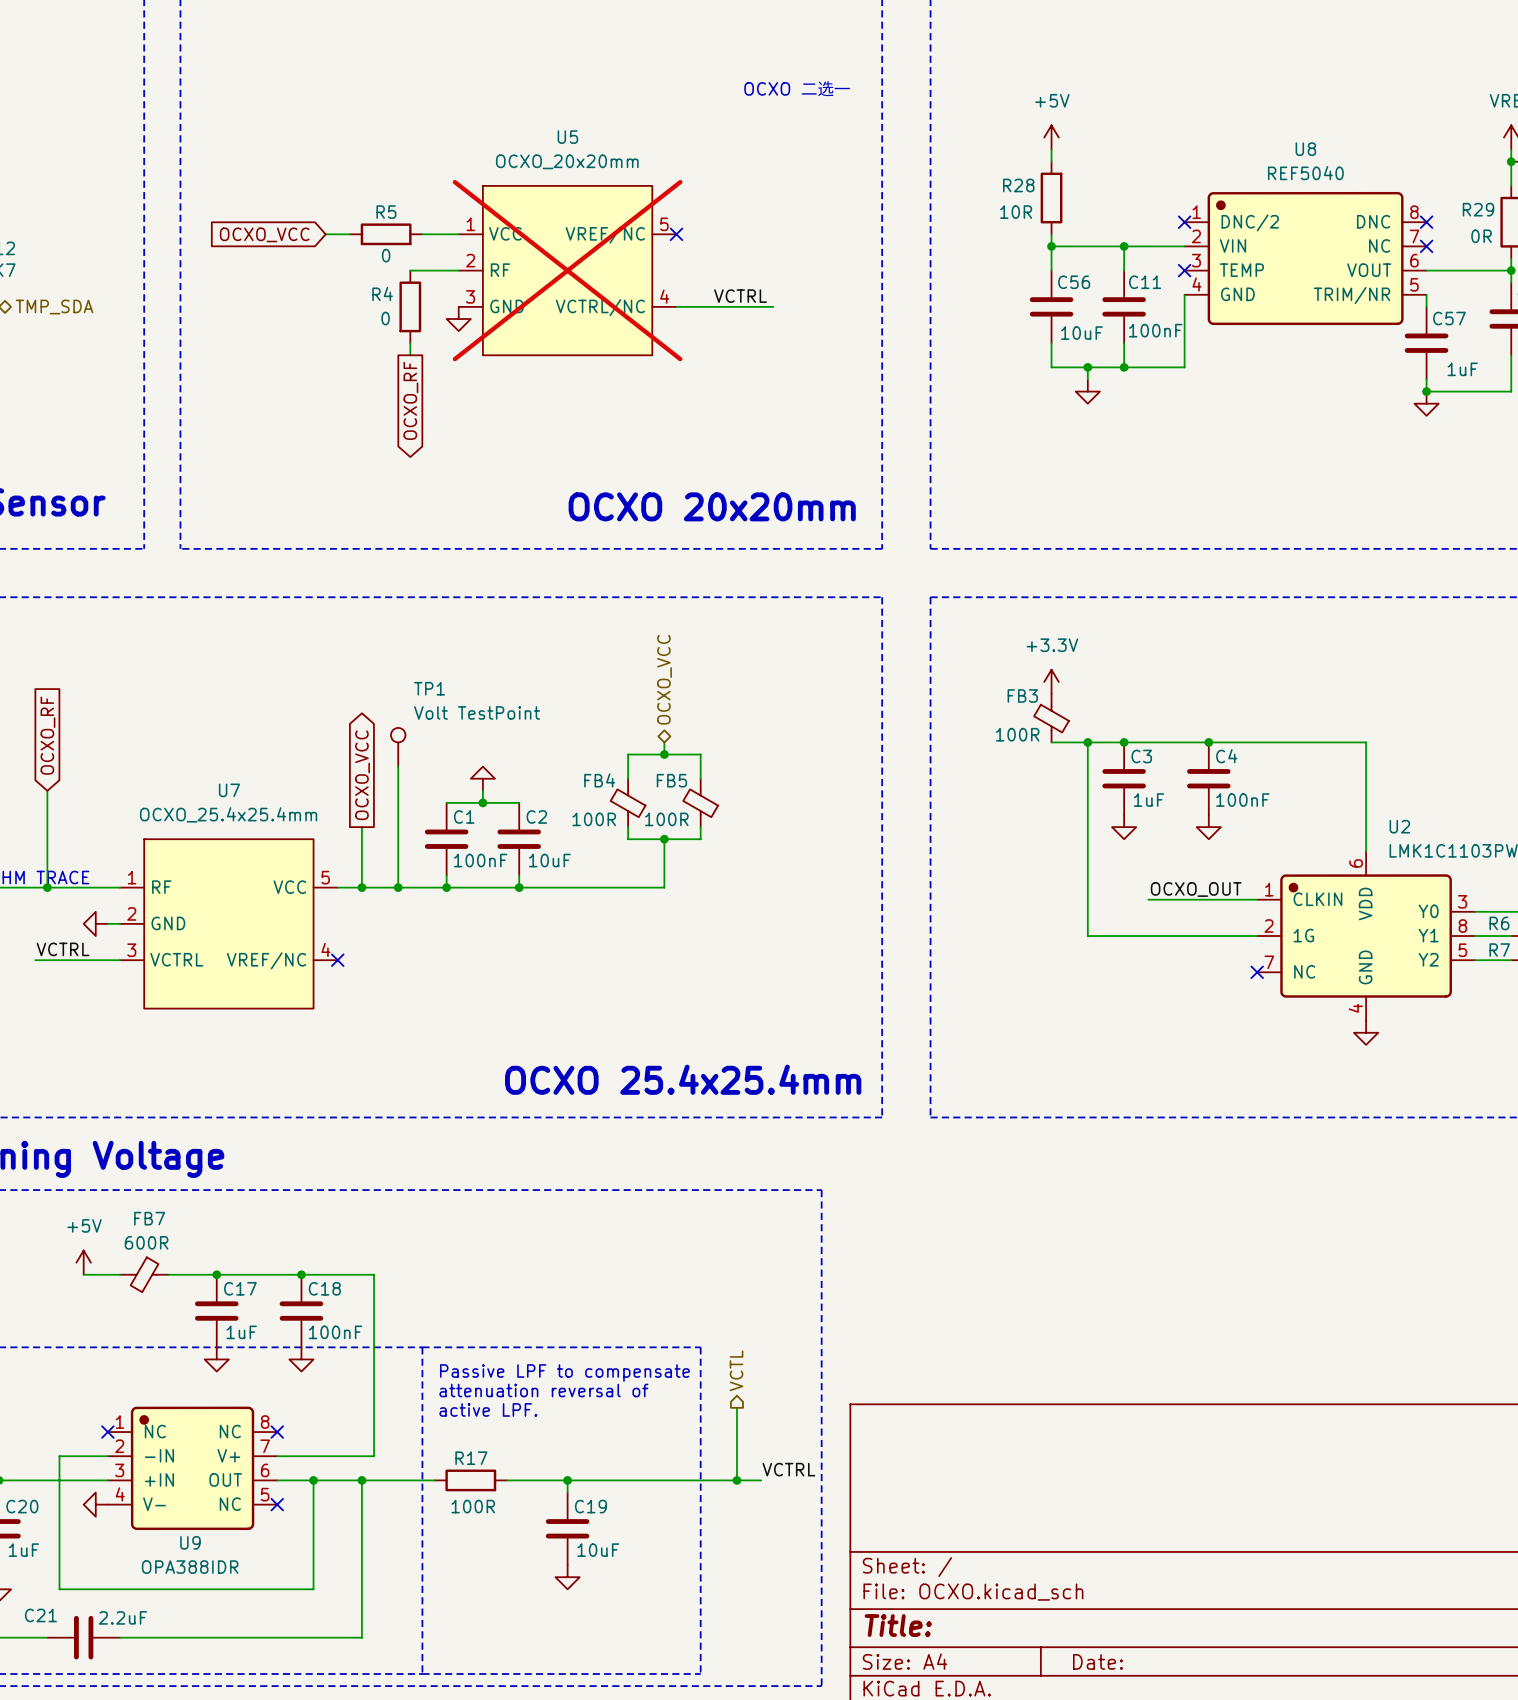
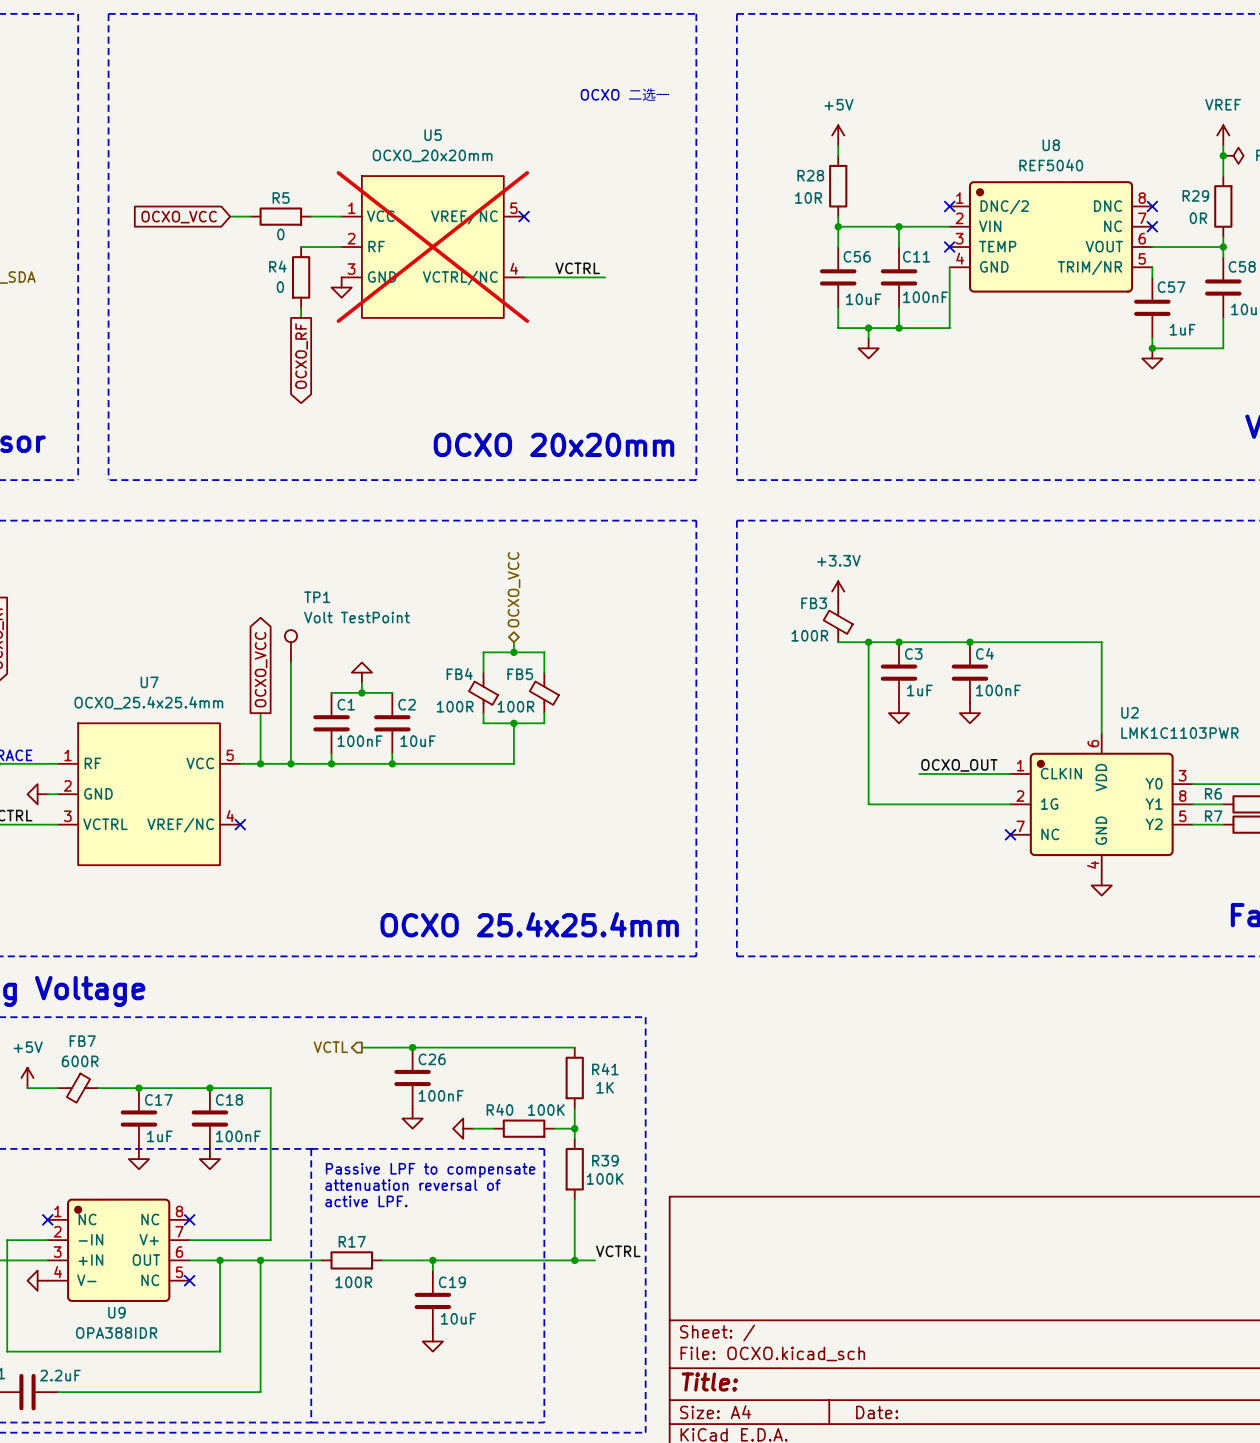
hierarchical label: none -> VCTL (330, 1047)
wire: none -> (361, 1047) (574, 1047)
junction: none -> (412, 1047)
C26: none -> 100nF (412, 1078)
R41: none -> 1K (574, 1078)
wire: none -> (574, 1108) (574, 1138)
power symbol: none -> (412, 1118)
power symbol: none -> (463, 1128)
wire: none -> (473, 1128) (493, 1128)
R40: none -> 100K (524, 1128)
wire: none -> (554, 1128) (574, 1128)
junction: none -> (574, 1128)
hierarchical label: VCTL (736, 1370) -> none
R39: none -> 100K (574, 1169)

